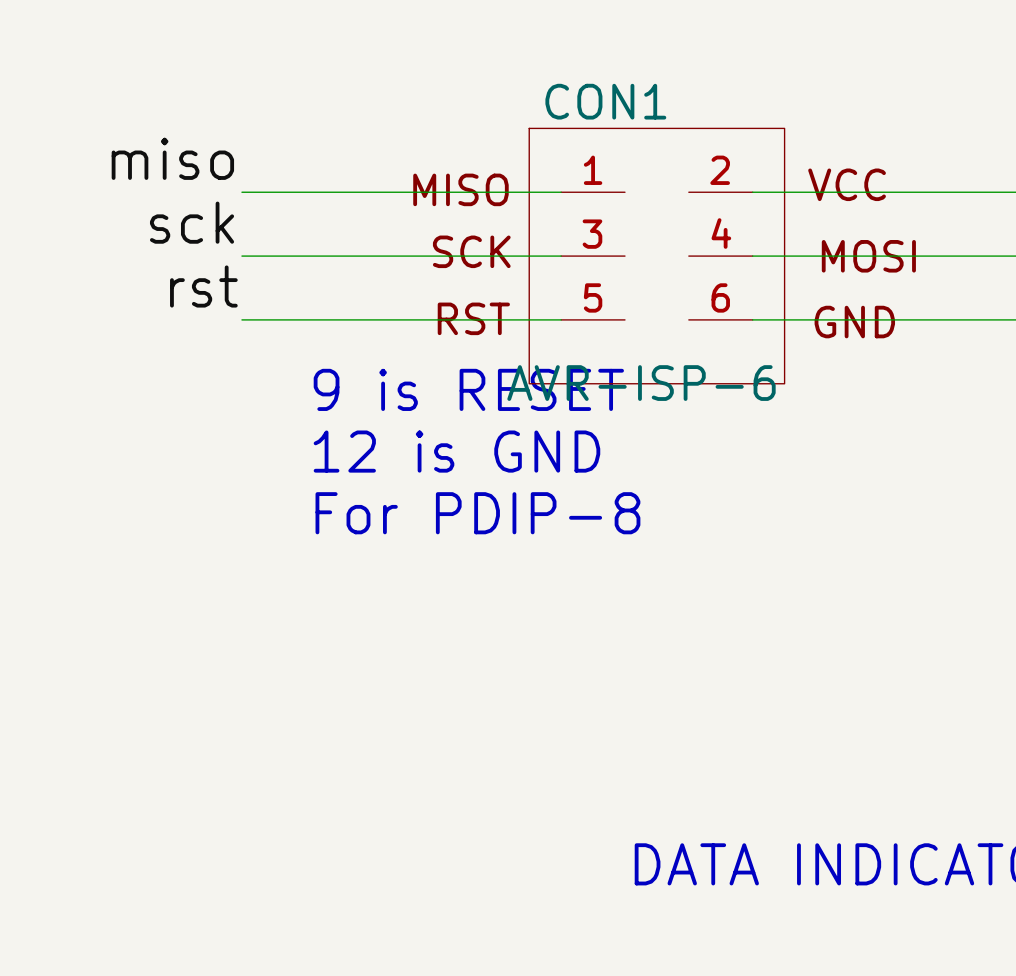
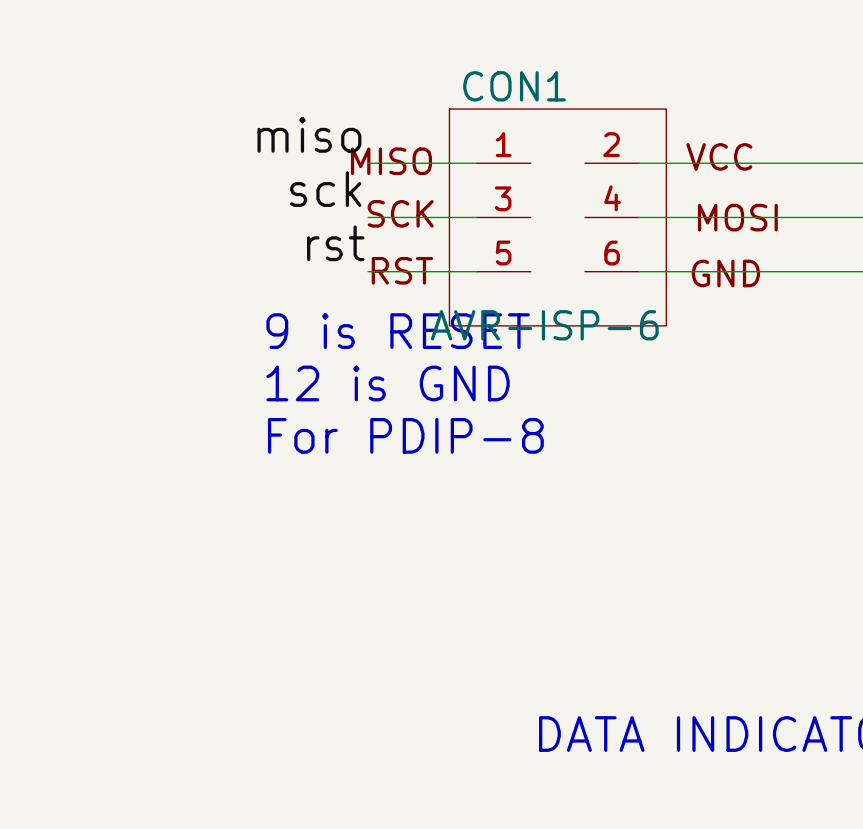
label position: miso (172, 158) -> miso (309, 134)
wire: (241, 192) (433, 192) -> none
label position: sck (192, 222) -> sck (325, 189)
wire: (241, 256) (433, 256) -> none
label position: rst (203, 286) -> rst (335, 243)
wire: (241, 319) (433, 319) -> none

